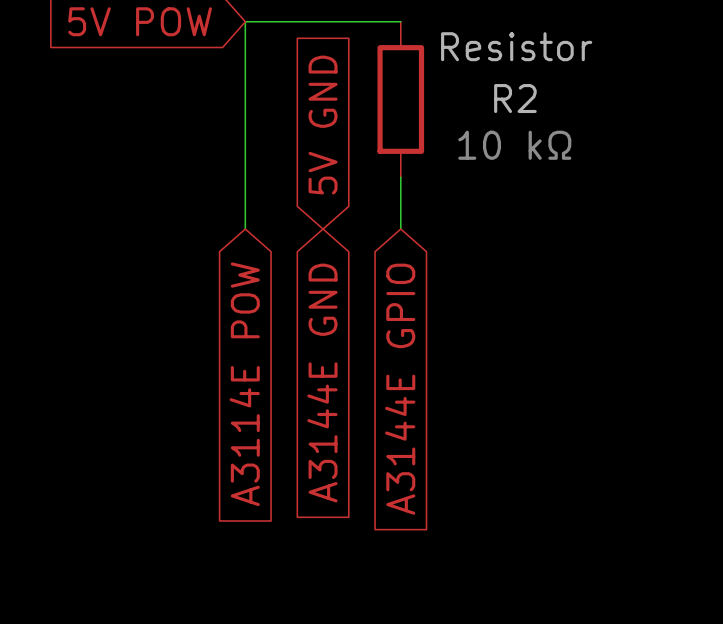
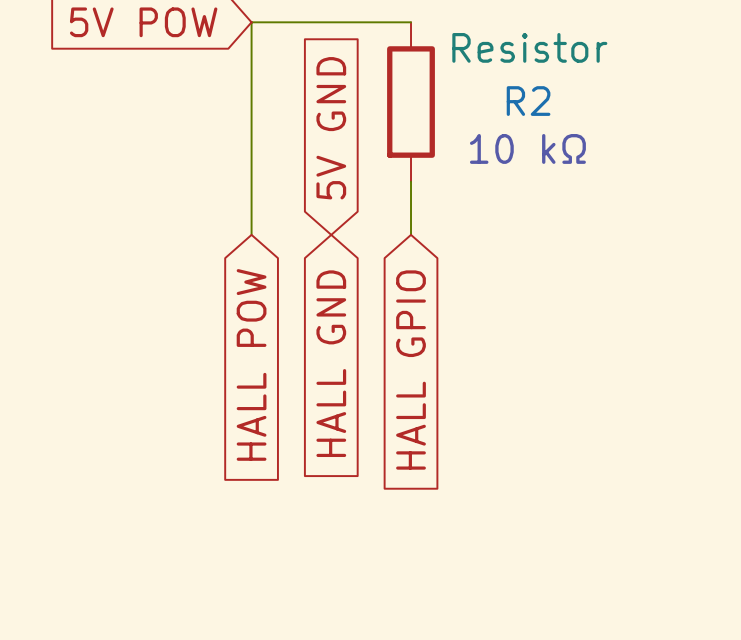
global label: A3144E GND (322, 383) -> HALL GND (331, 363)
global label: A3114E POW (244, 384) -> HALL POW (251, 364)
global label: A3144E GPIO (400, 389) -> HALL GPIO (411, 370)

